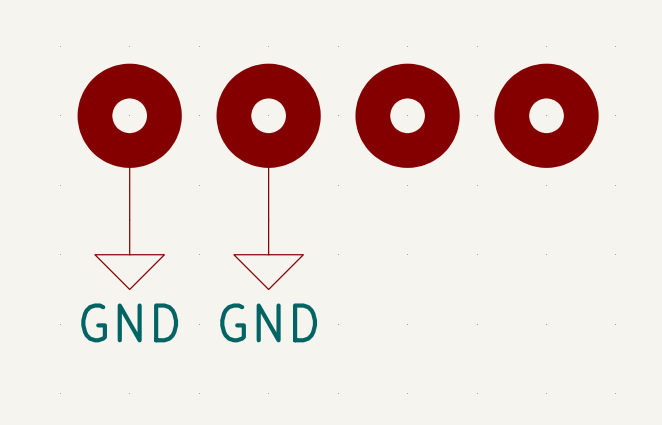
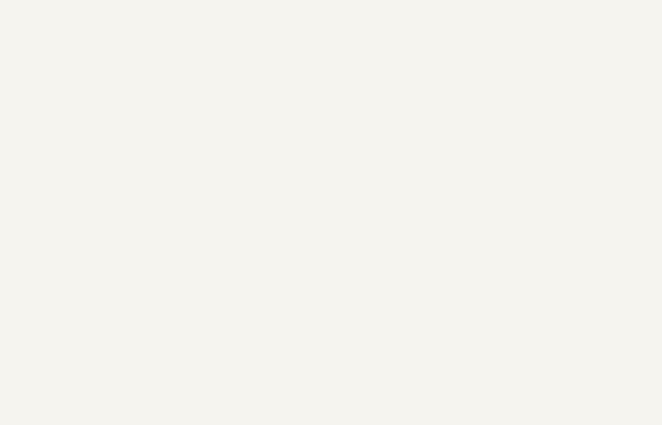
part: (407, 115) -> none
part: (546, 115) -> none
part: (129, 141) -> none
part: (268, 141) -> none
power symbol: GND (129, 254) -> none
power symbol: GND (268, 254) -> none

